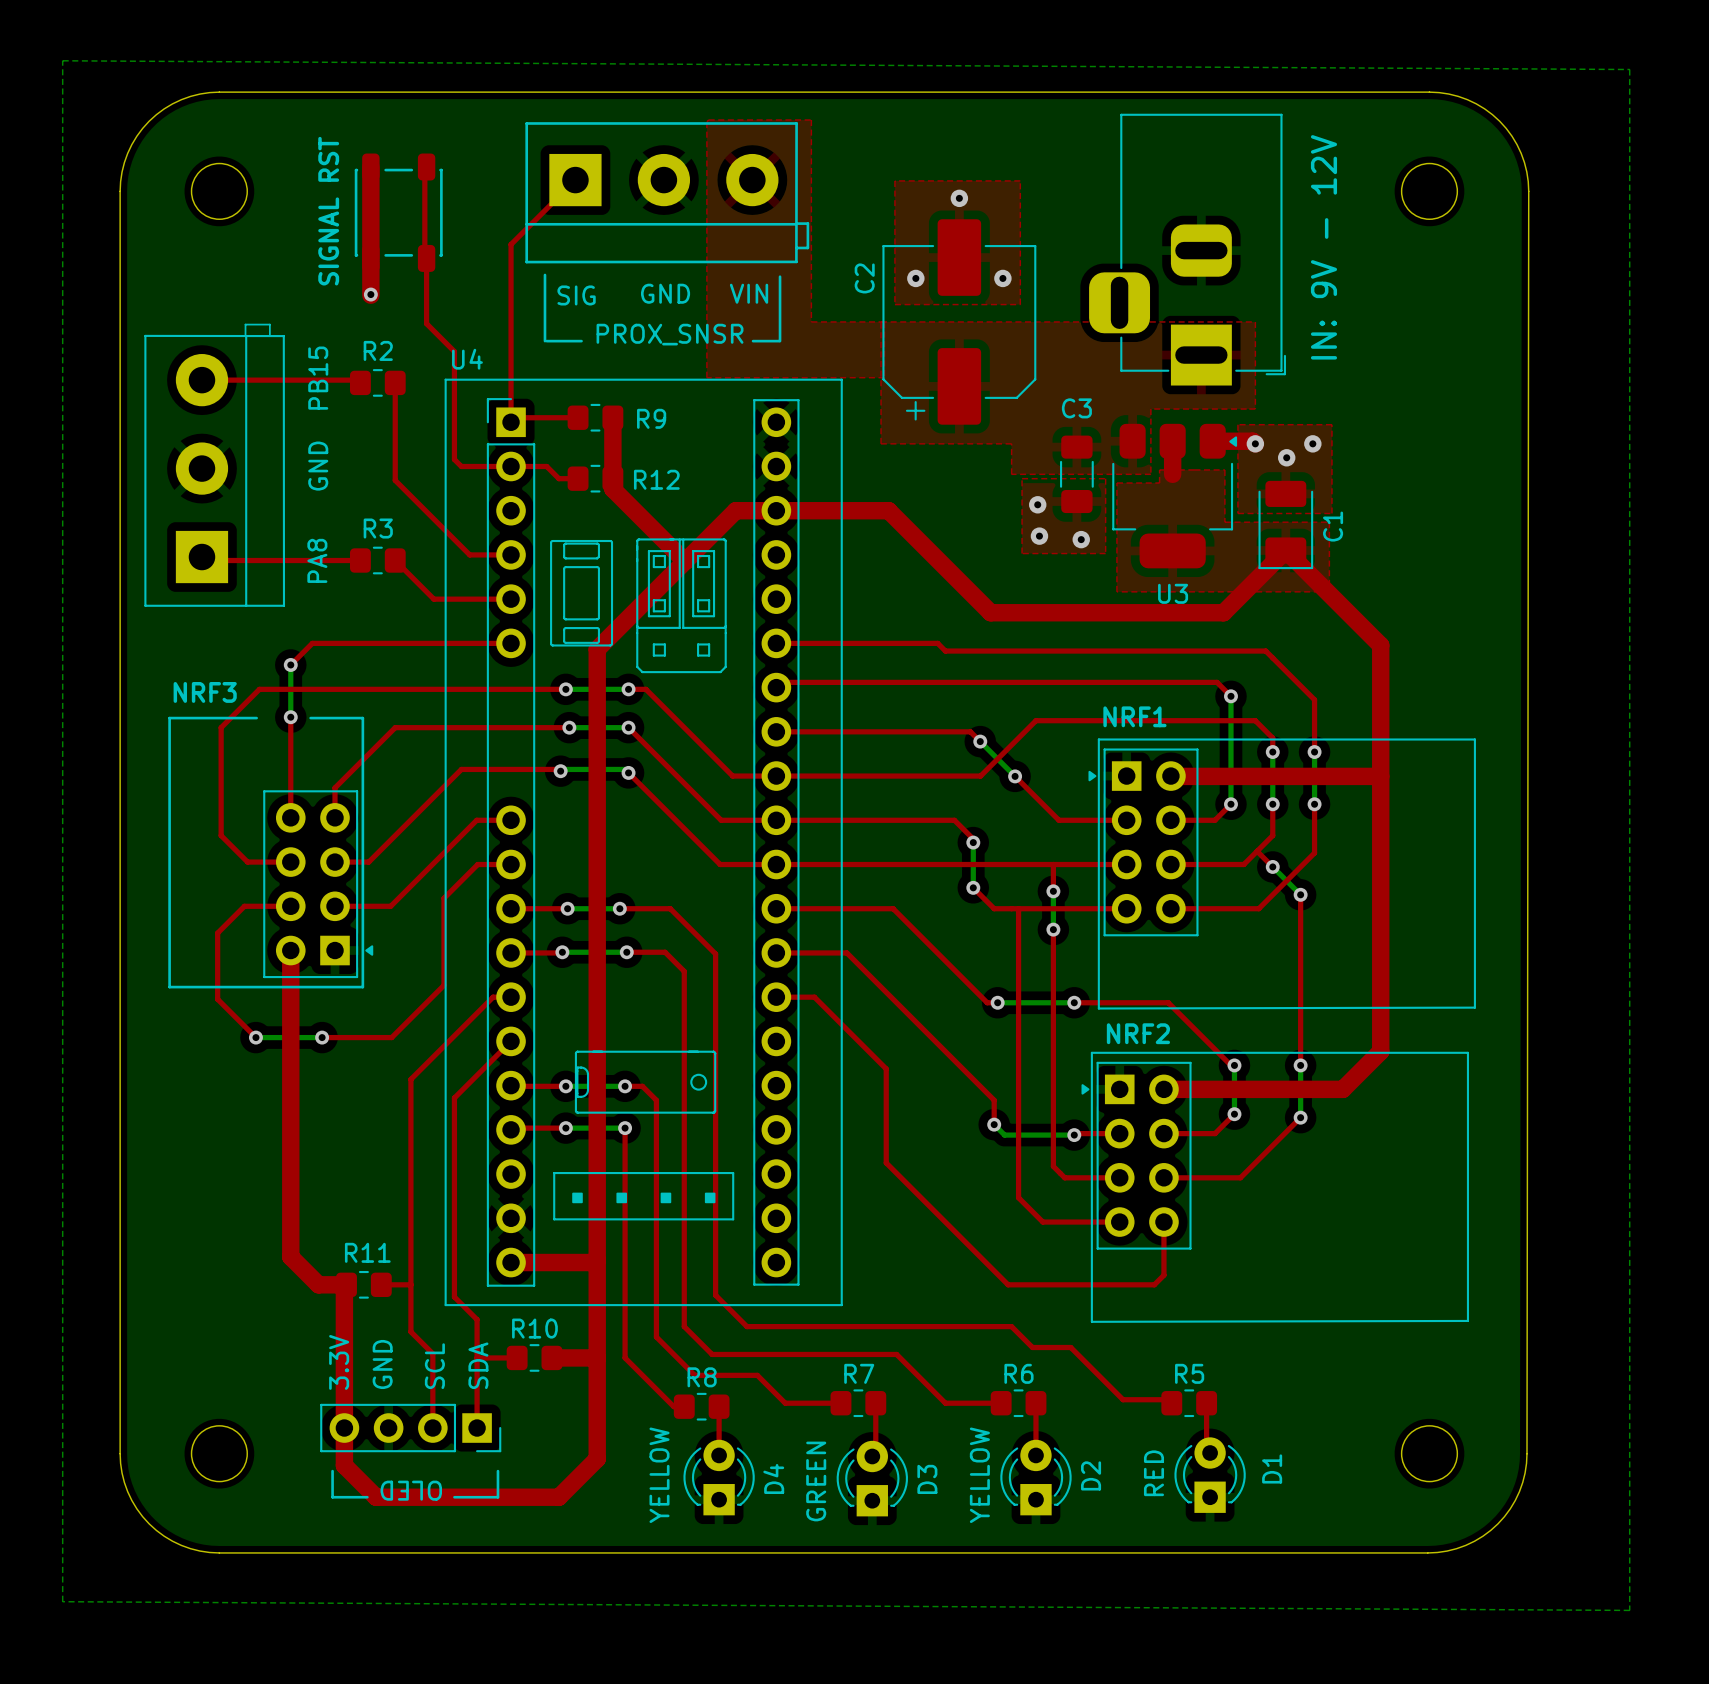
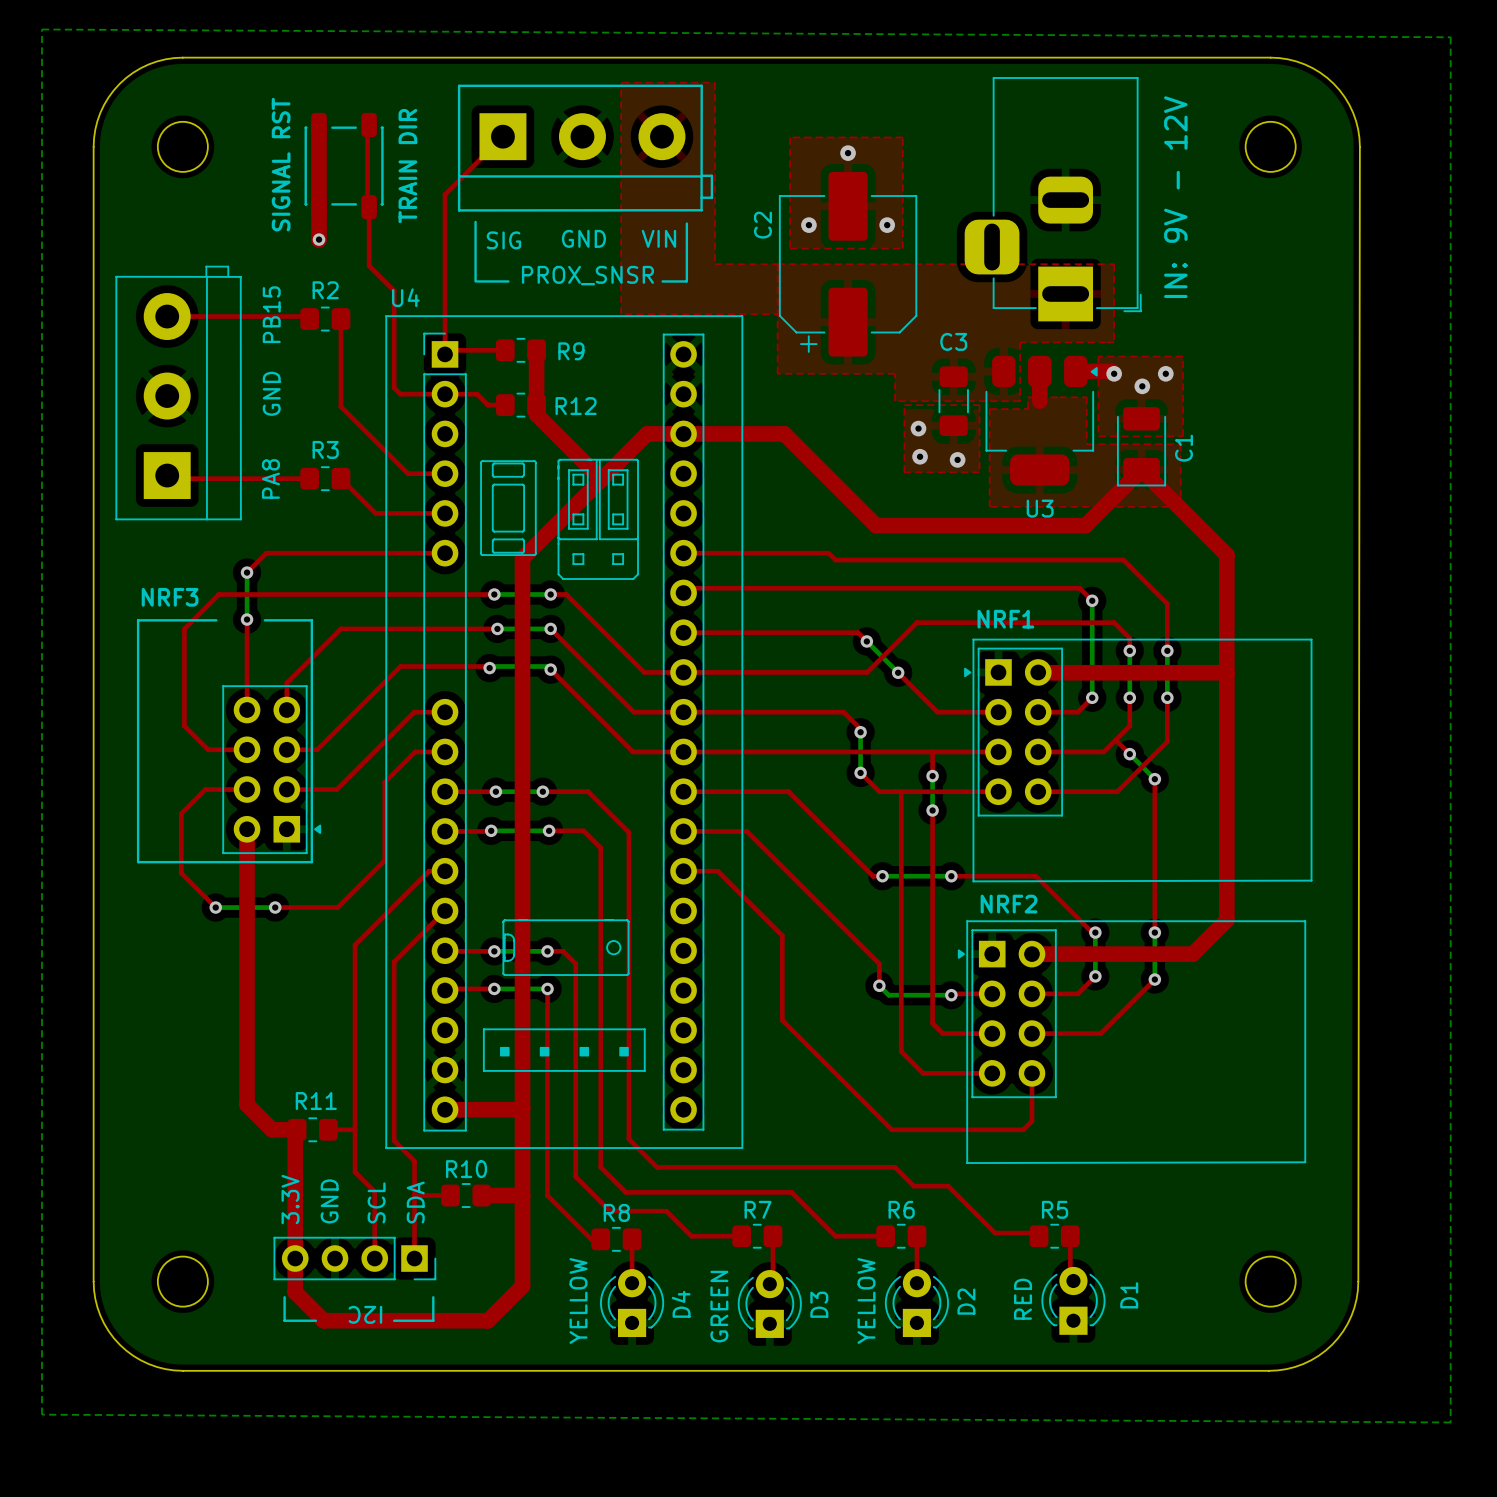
text: none -> TRAIN DIR (407, 166)
text: OLED (411, 1490) -> I2C (365, 1314)

